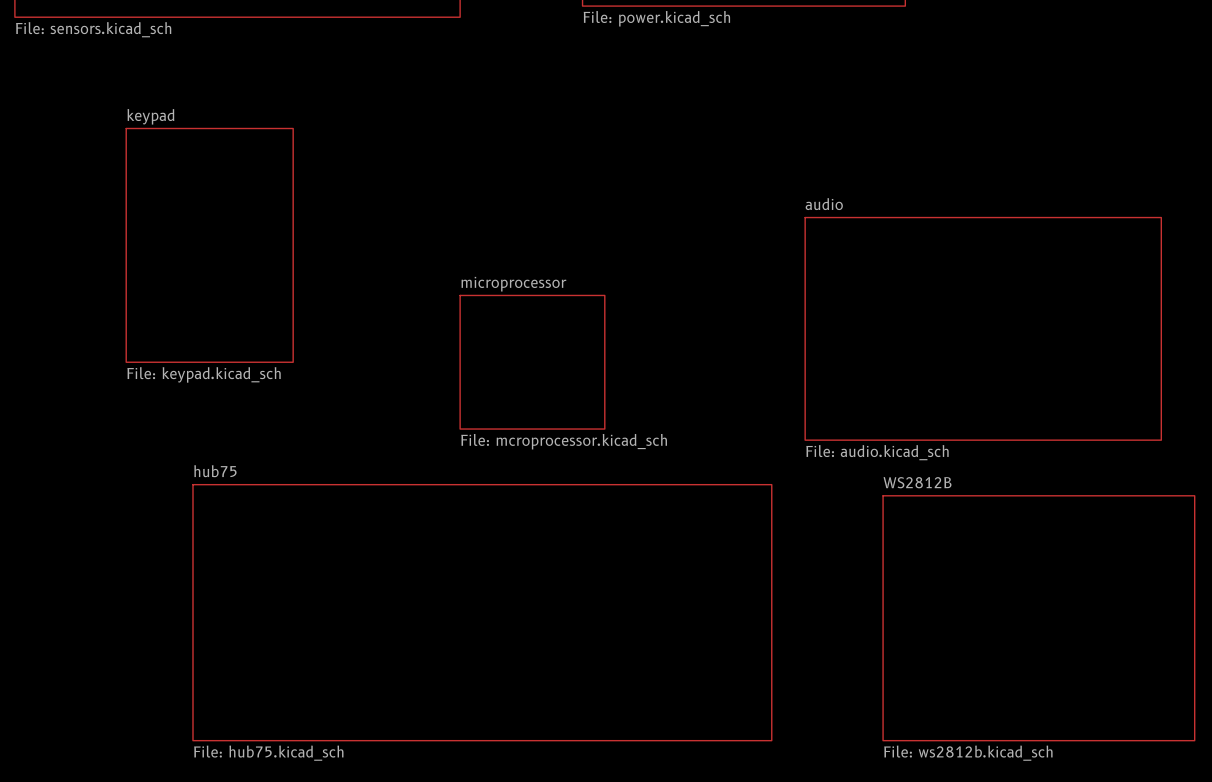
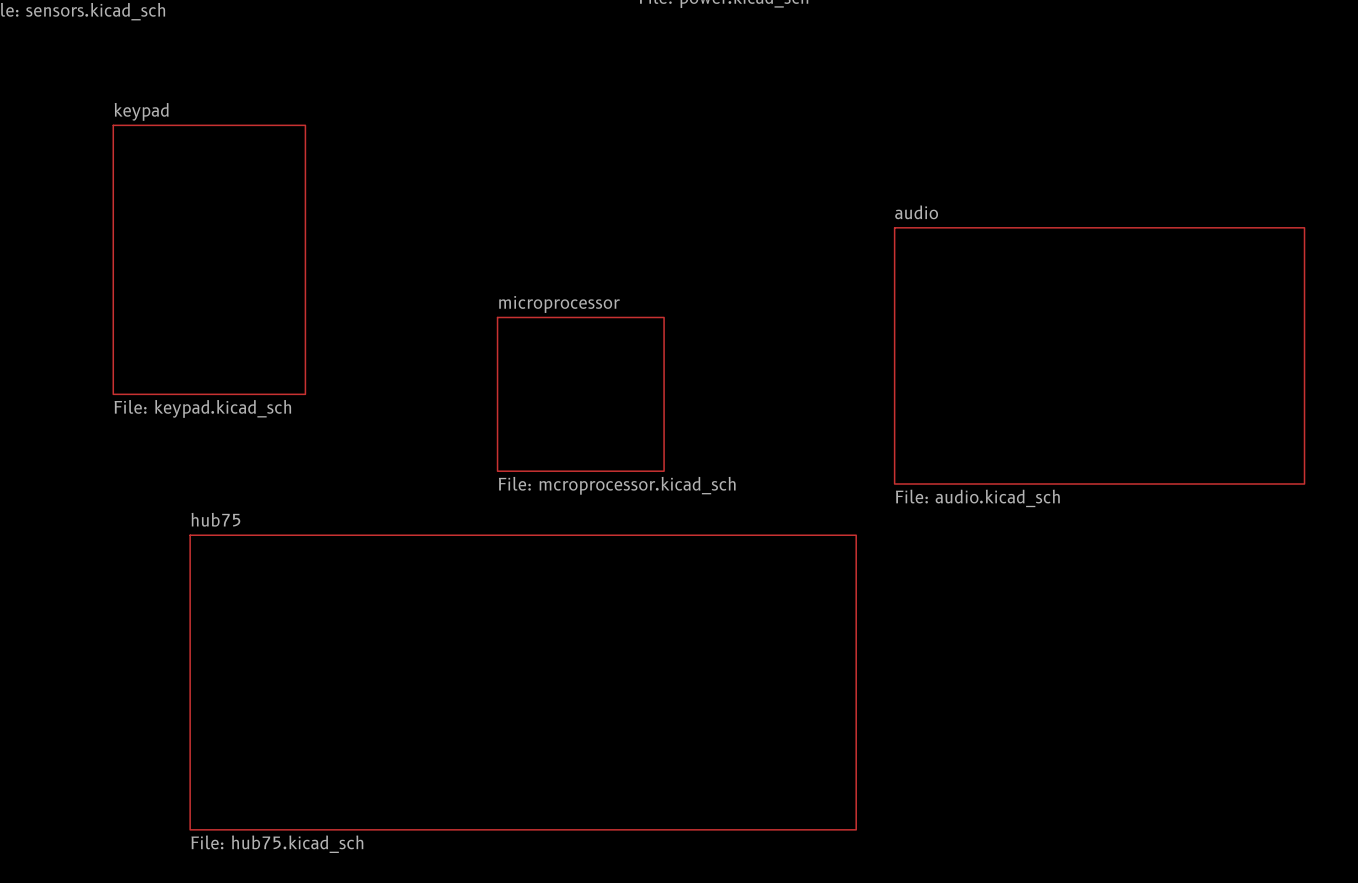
sheet WS2812B: File: ws2812b.kicad_sch (1038, 618) -> none

